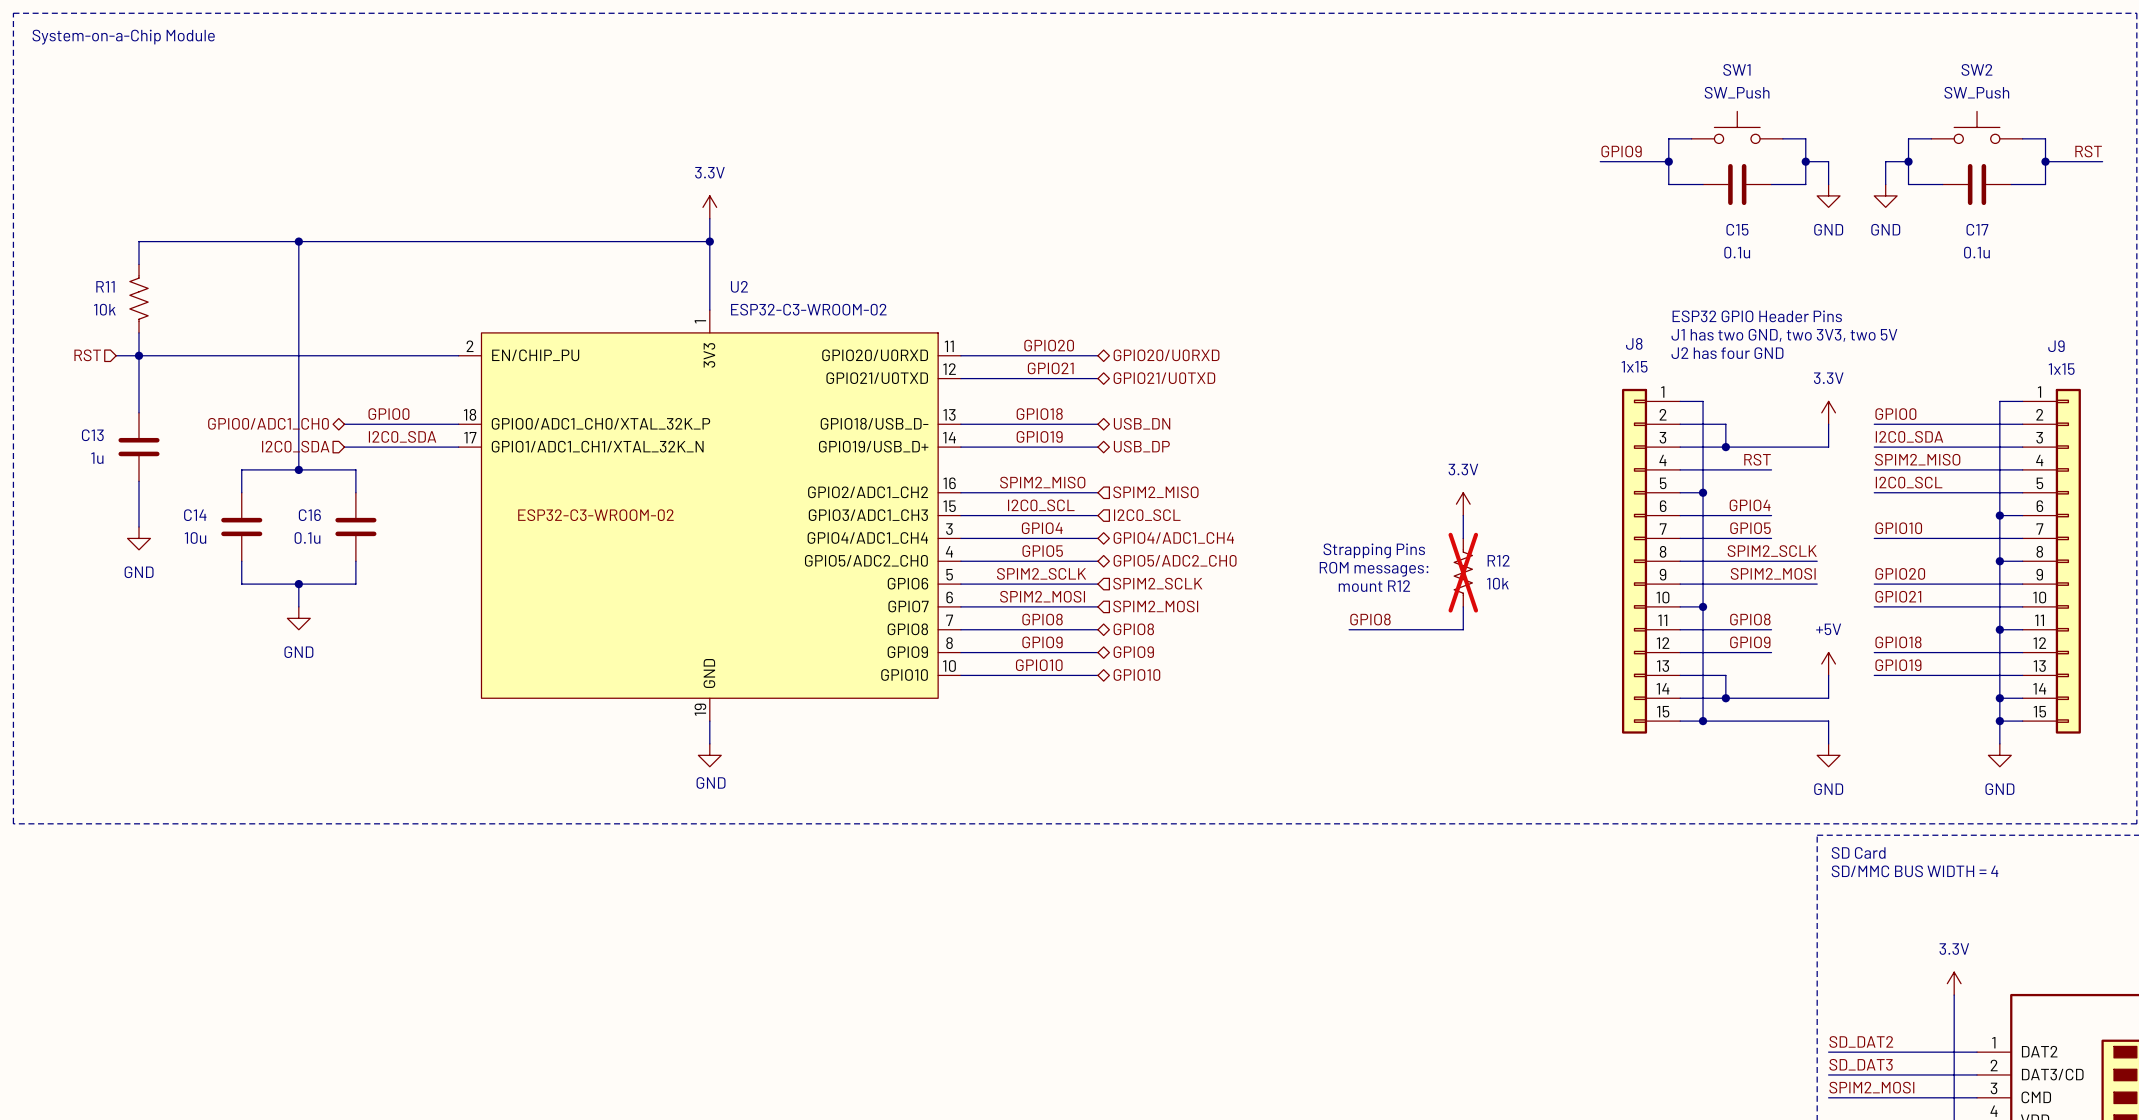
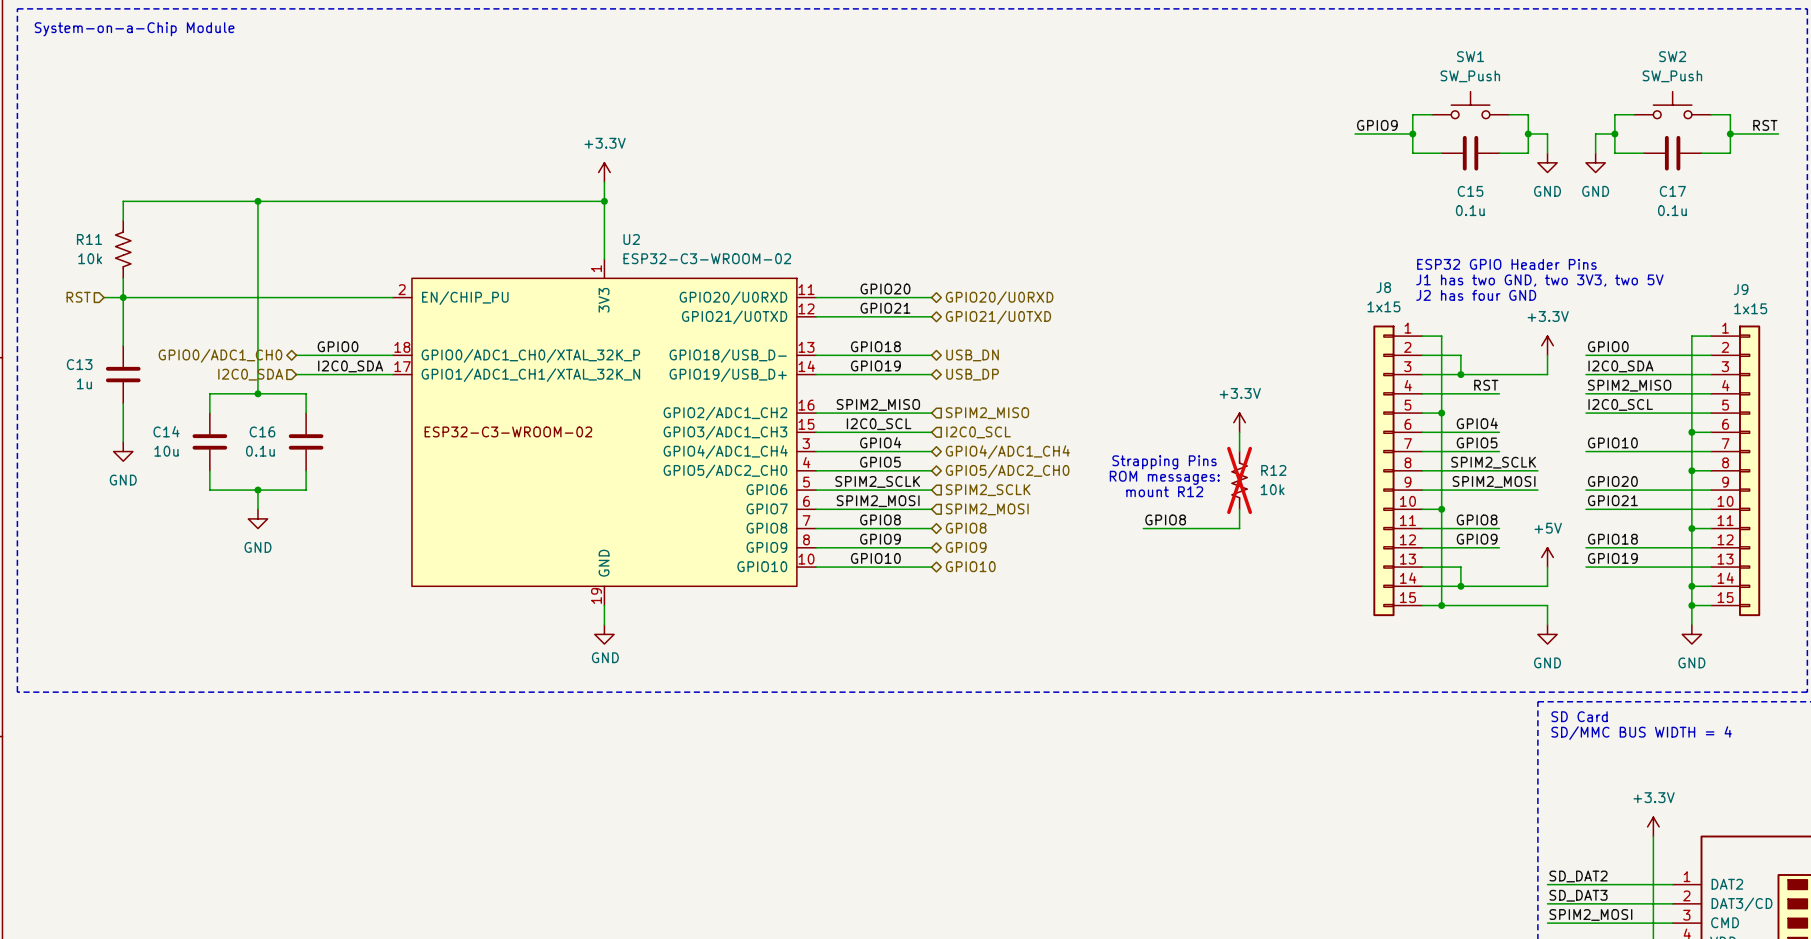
power symbol: 3.3V (709, 207) -> +3.3V (604, 172)
power symbol: 3.3V (1828, 412) -> +3.3V (1547, 345)
power symbol: 3.3V (1463, 504) -> +3.3V (1239, 422)
power symbol: 3.3V (1954, 983) -> +3.3V (1653, 826)

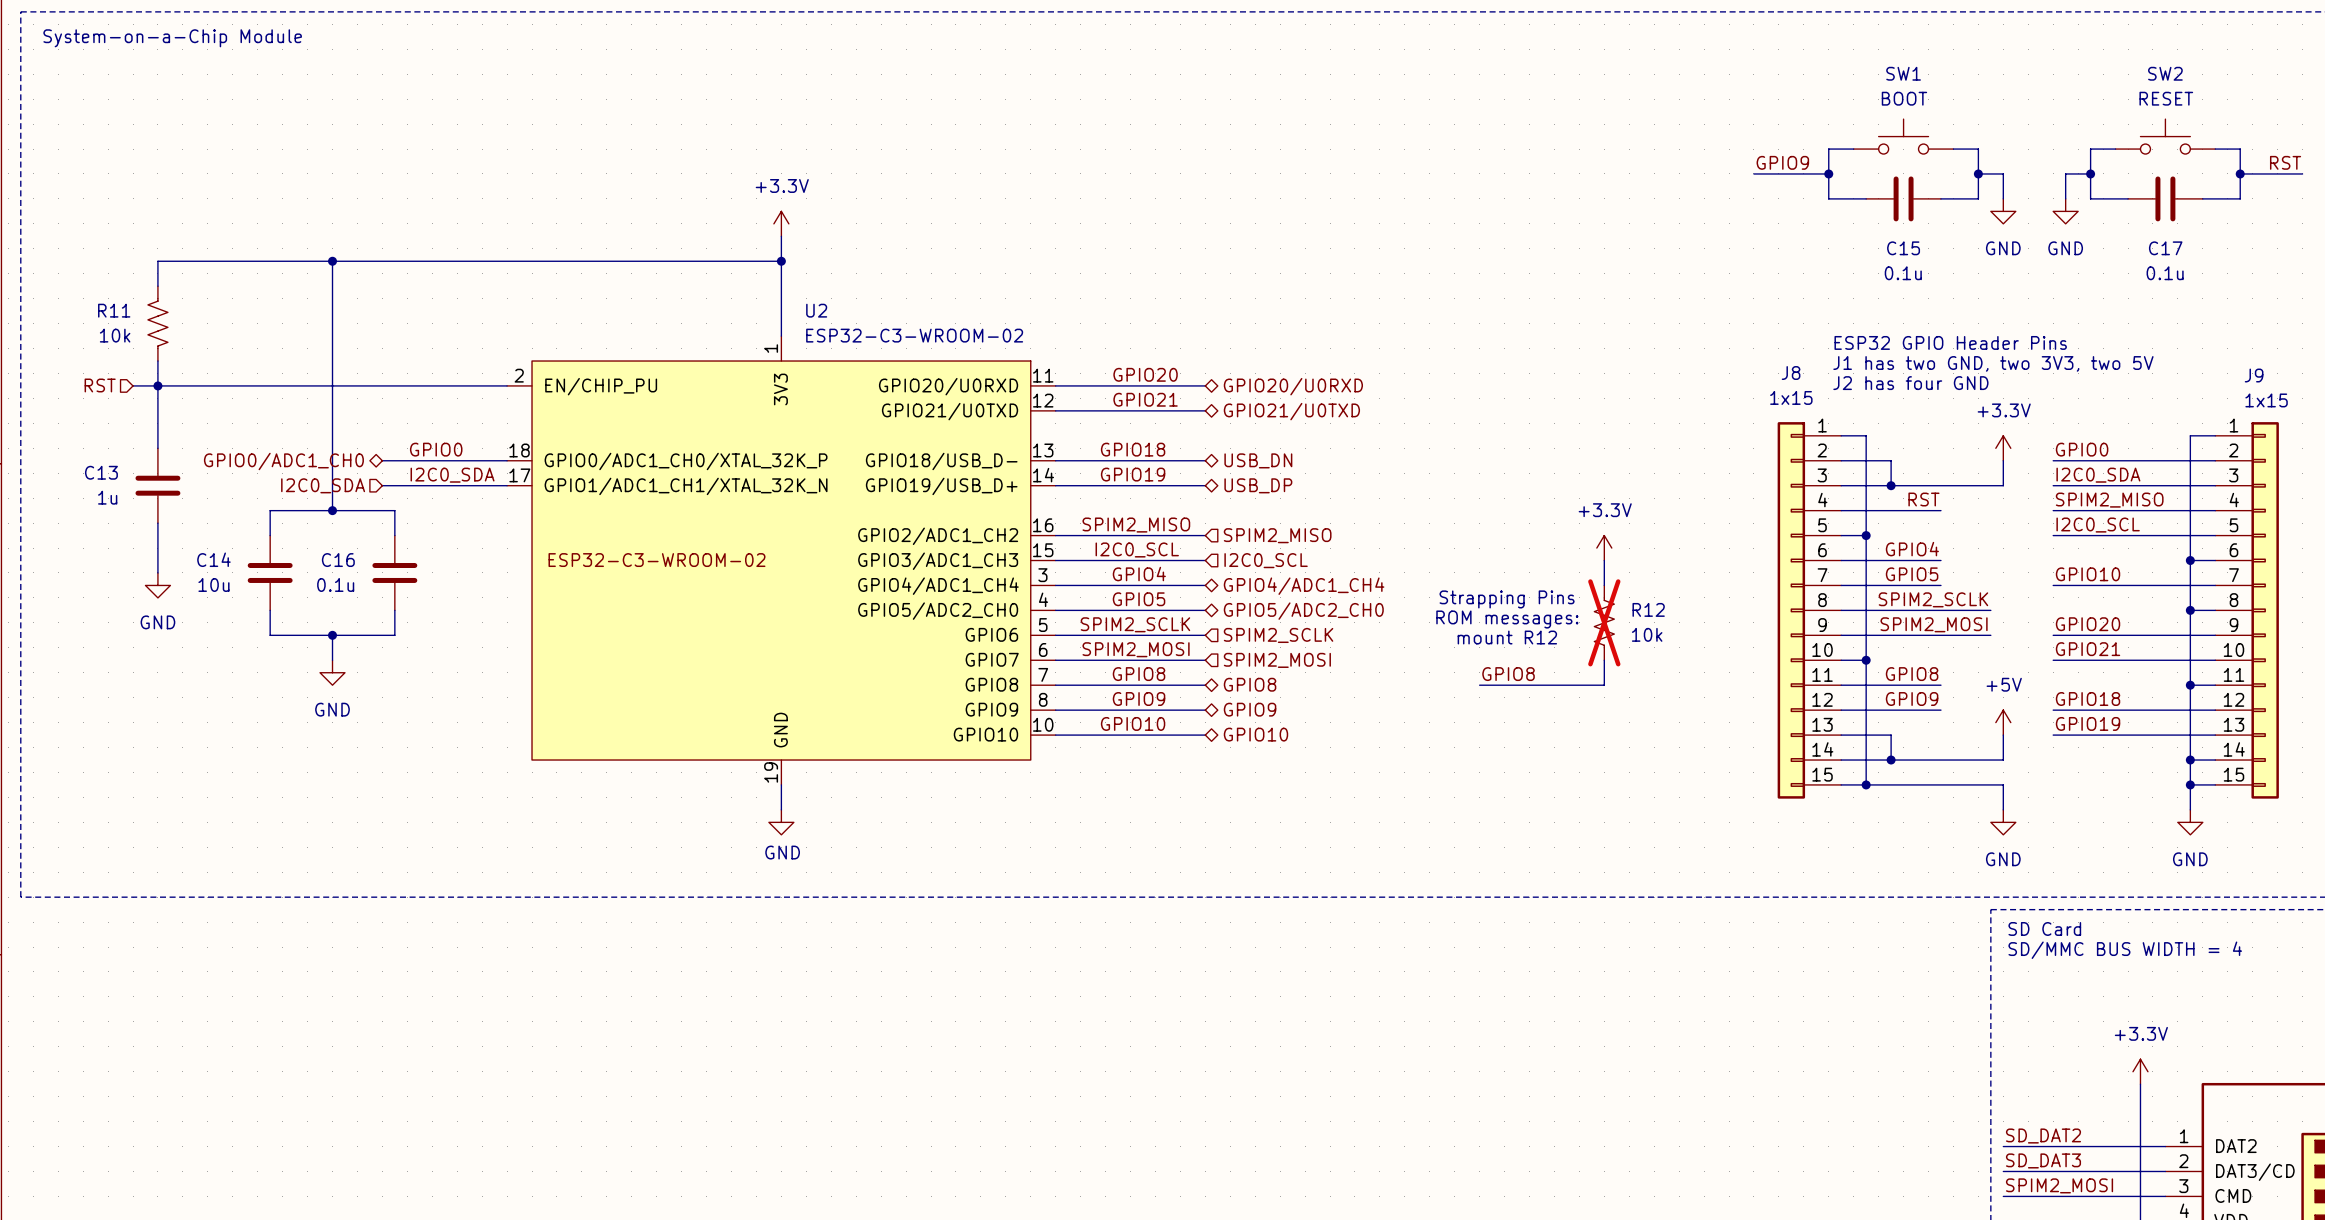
SW1 value: SW_Push (1470, 76) -> BOOT (1904, 98)
SW2 value: SW_Push (1672, 76) -> RESET (2166, 98)

